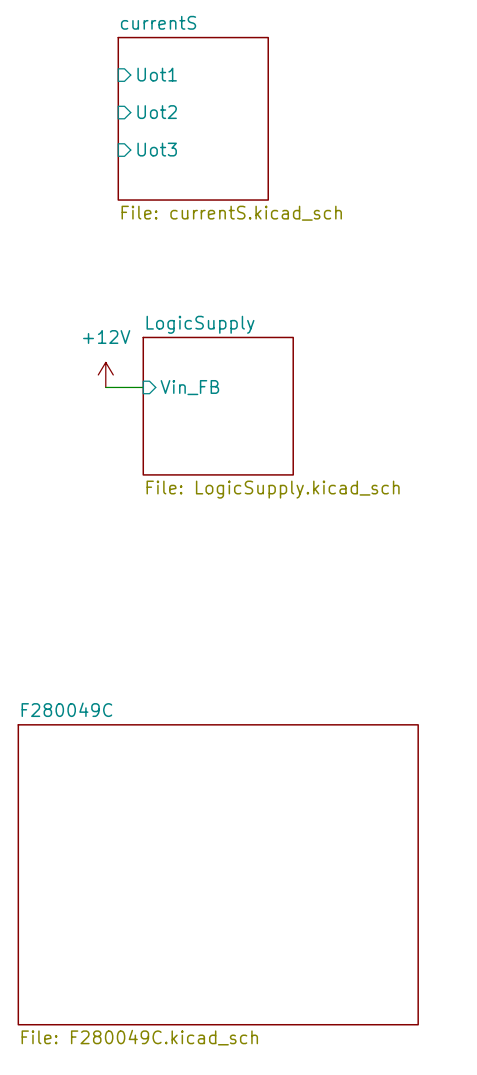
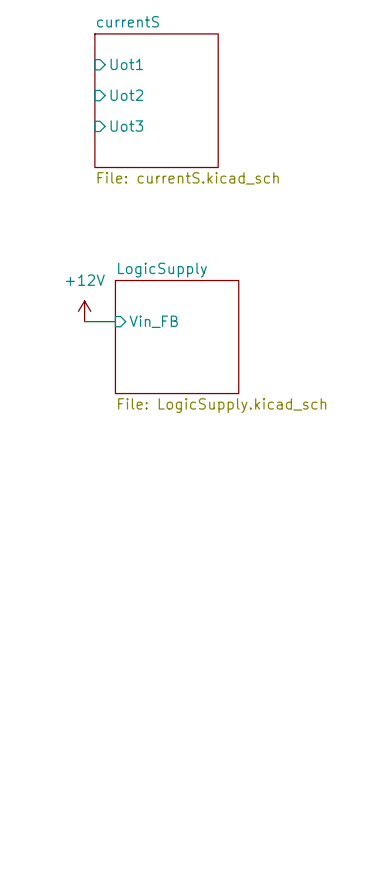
sheet F280049C: File: F280049C.kicad_sch (218, 874) -> none

